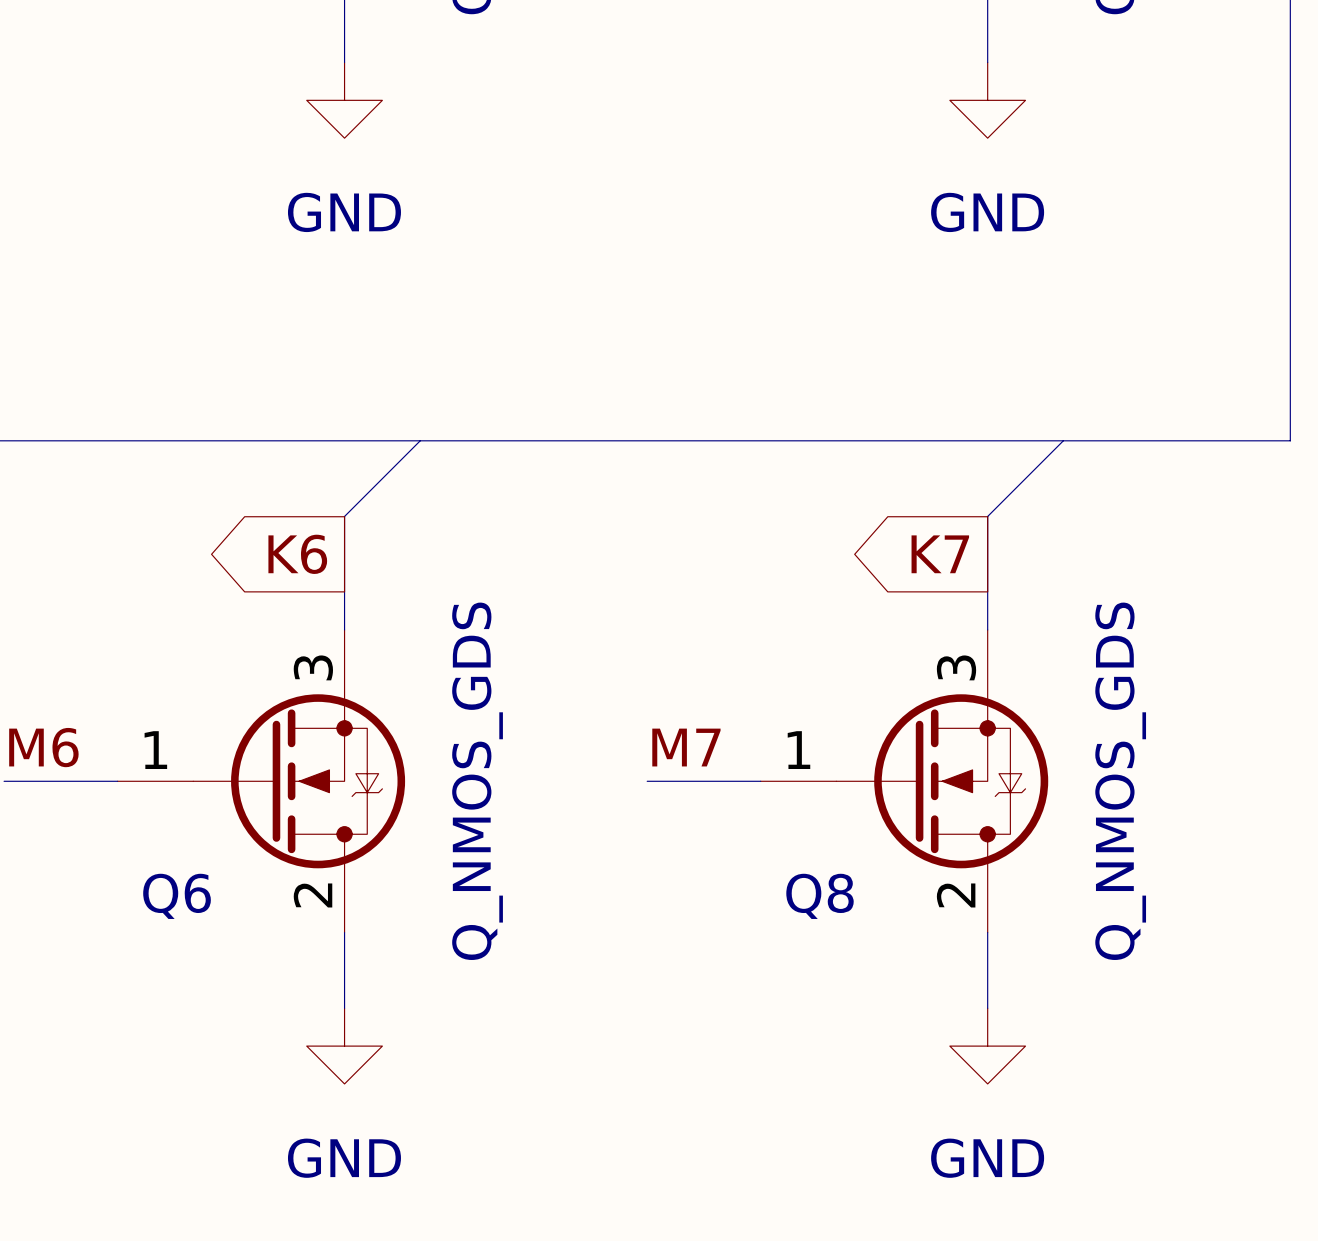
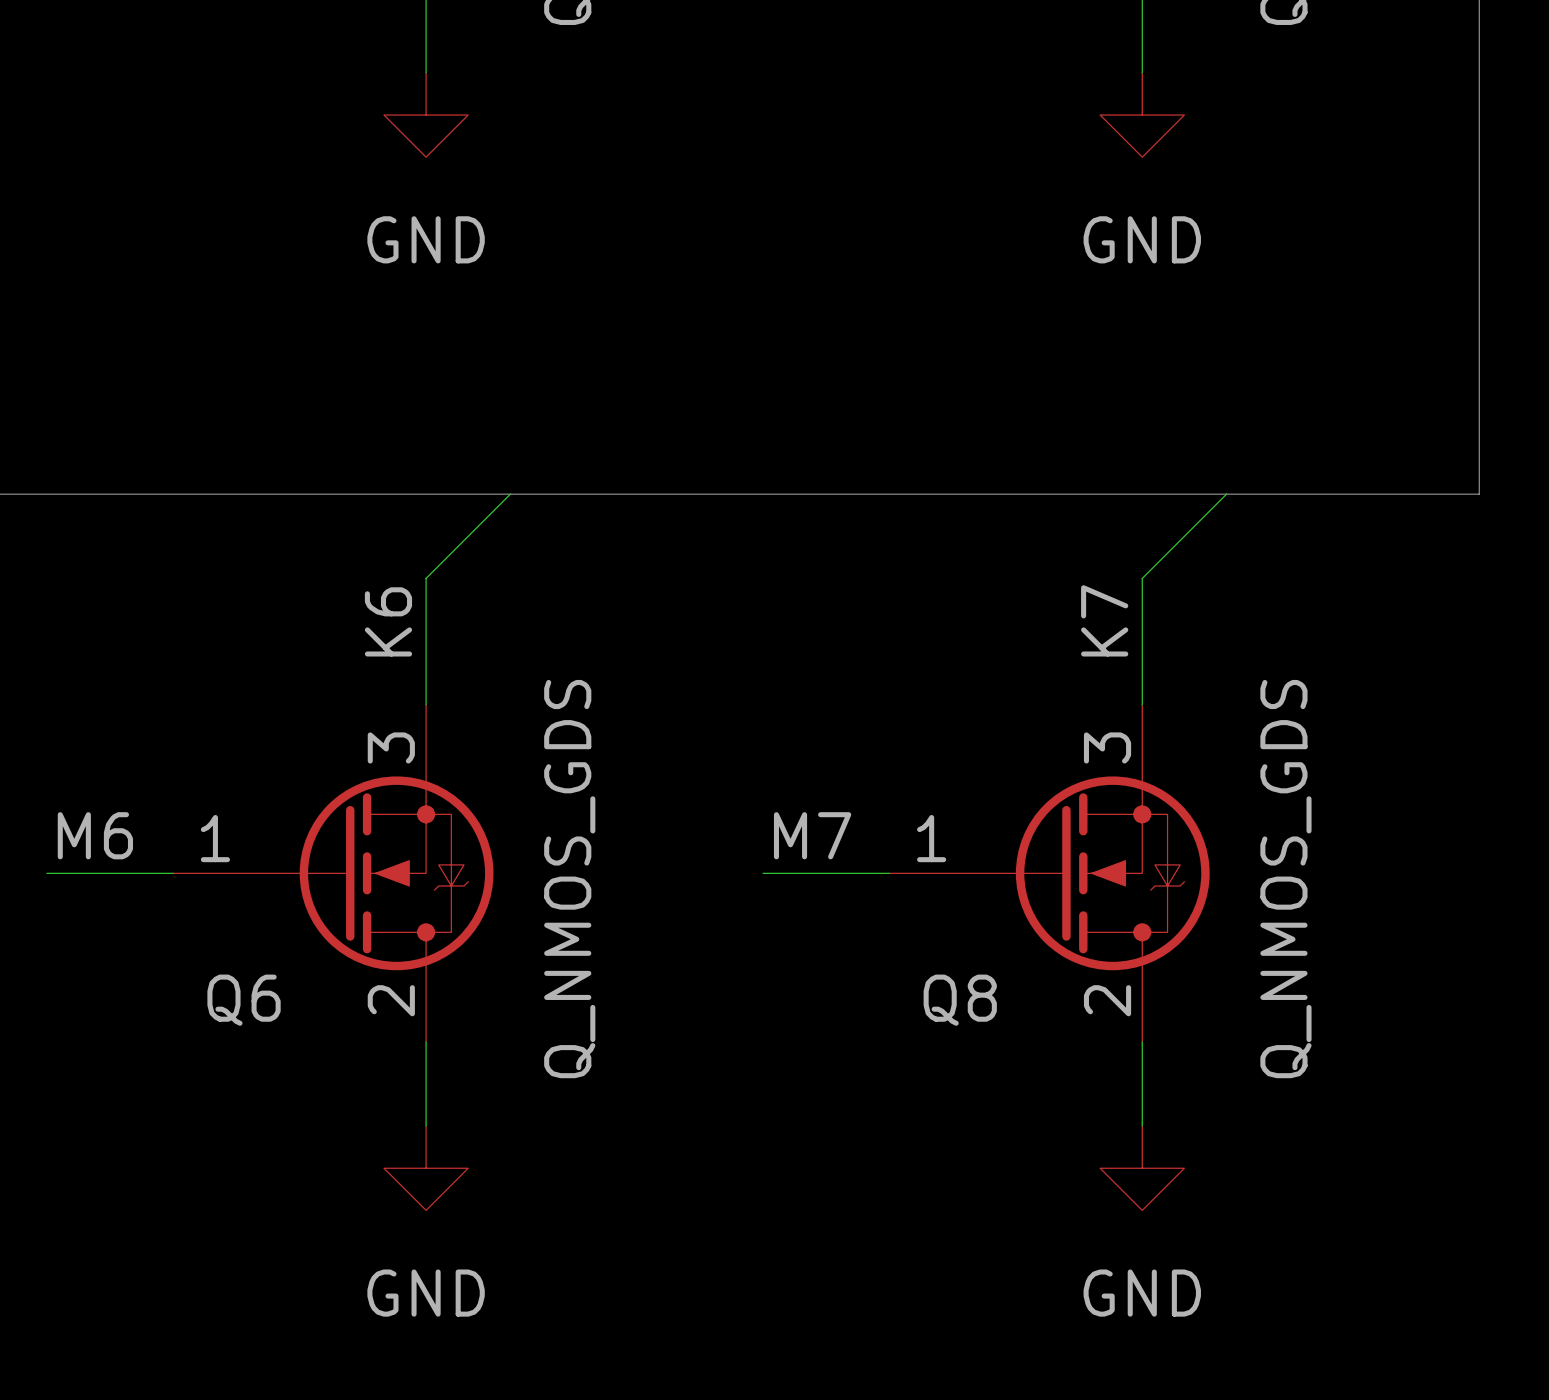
label: none -> K6 (388, 621)
label: none -> K7 (1104, 620)
global label: K6 (297, 554) -> none
global label: K7 (940, 554) -> none

